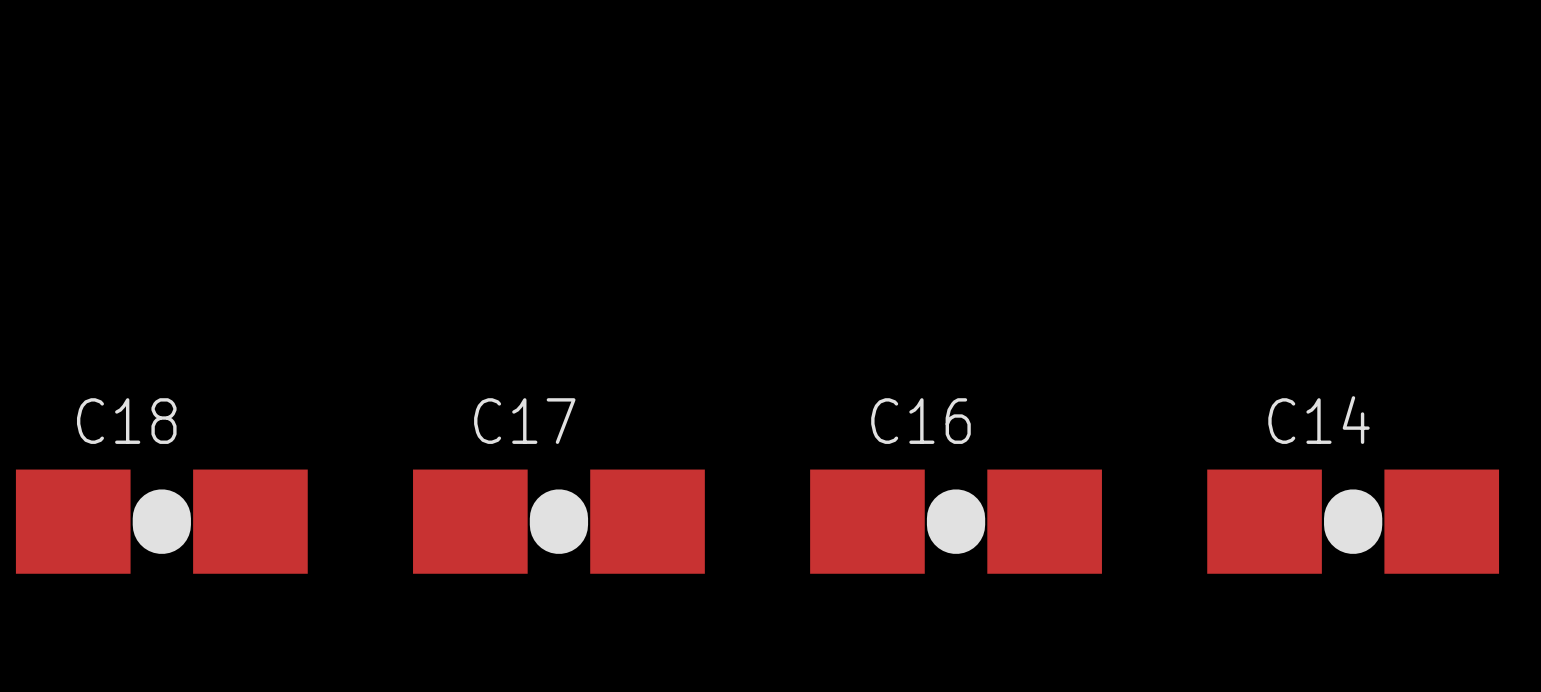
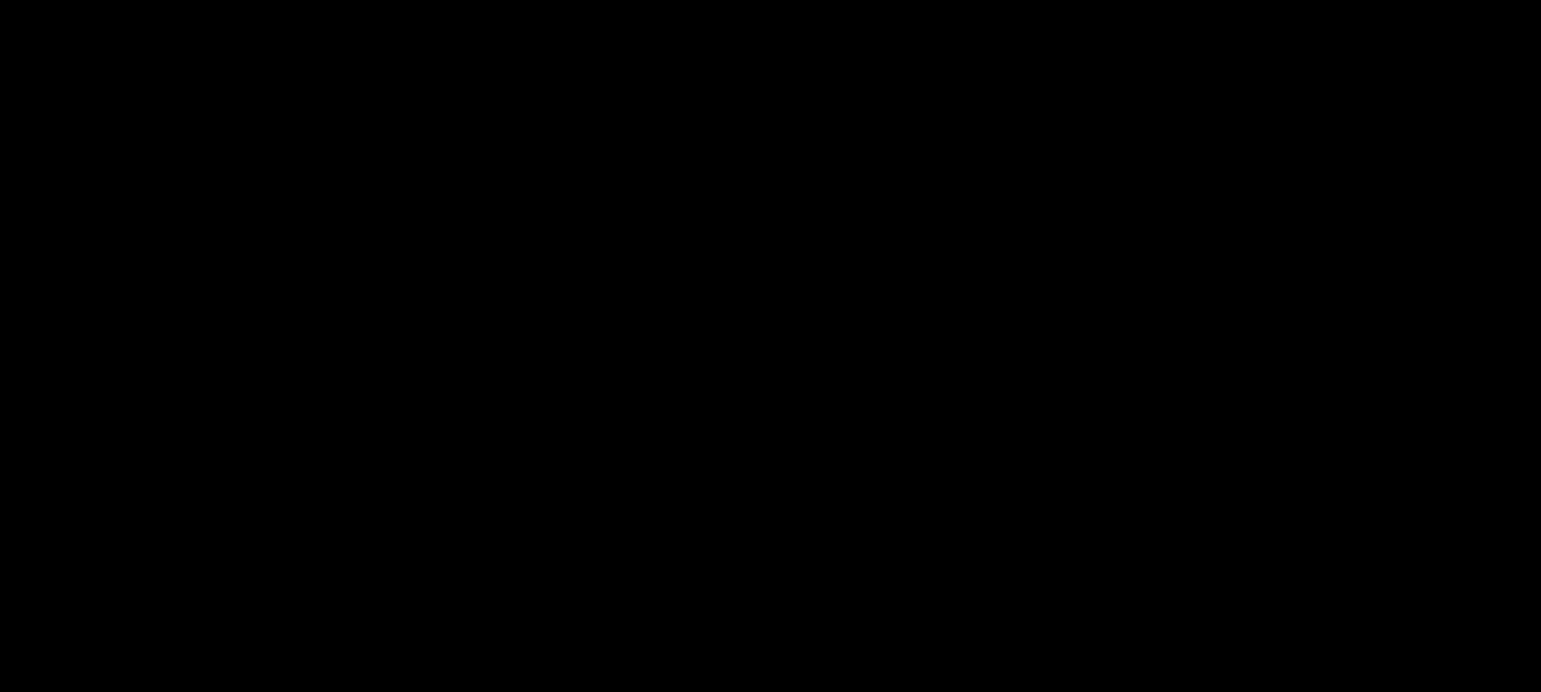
C18: (161, 521) -> none
C17: (558, 521) -> none
C16: (956, 521) -> none
C14: (1353, 521) -> none

